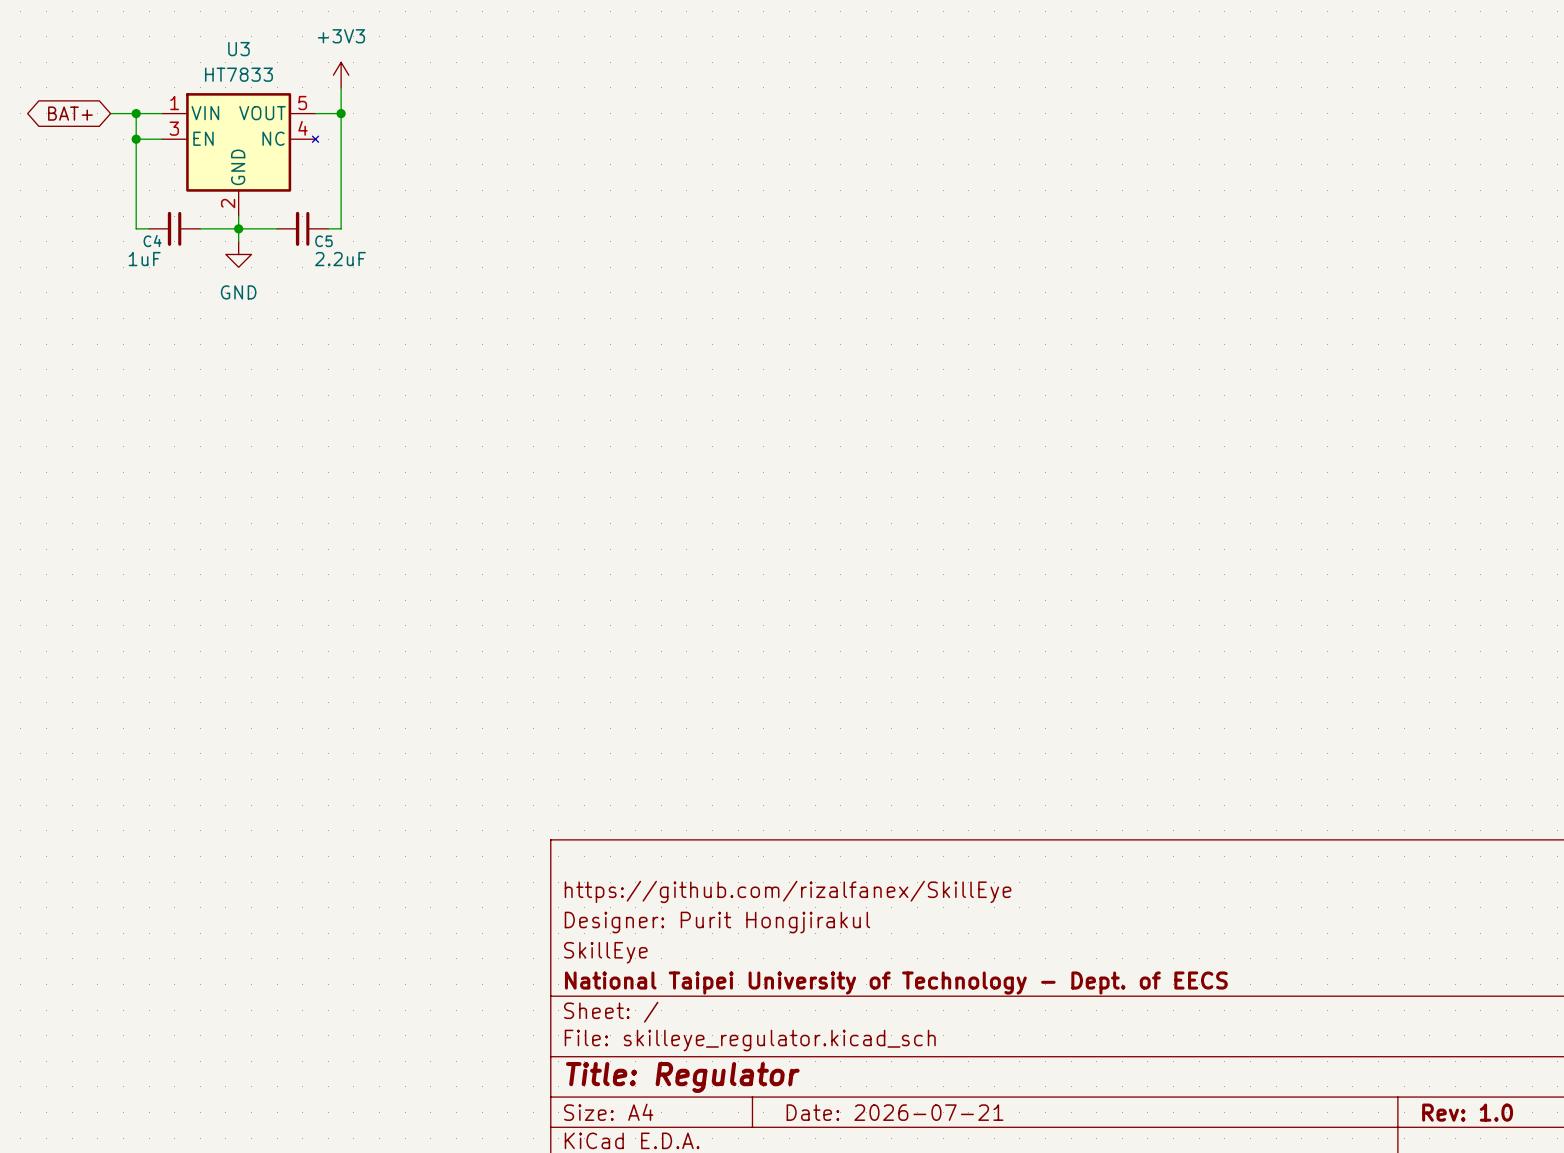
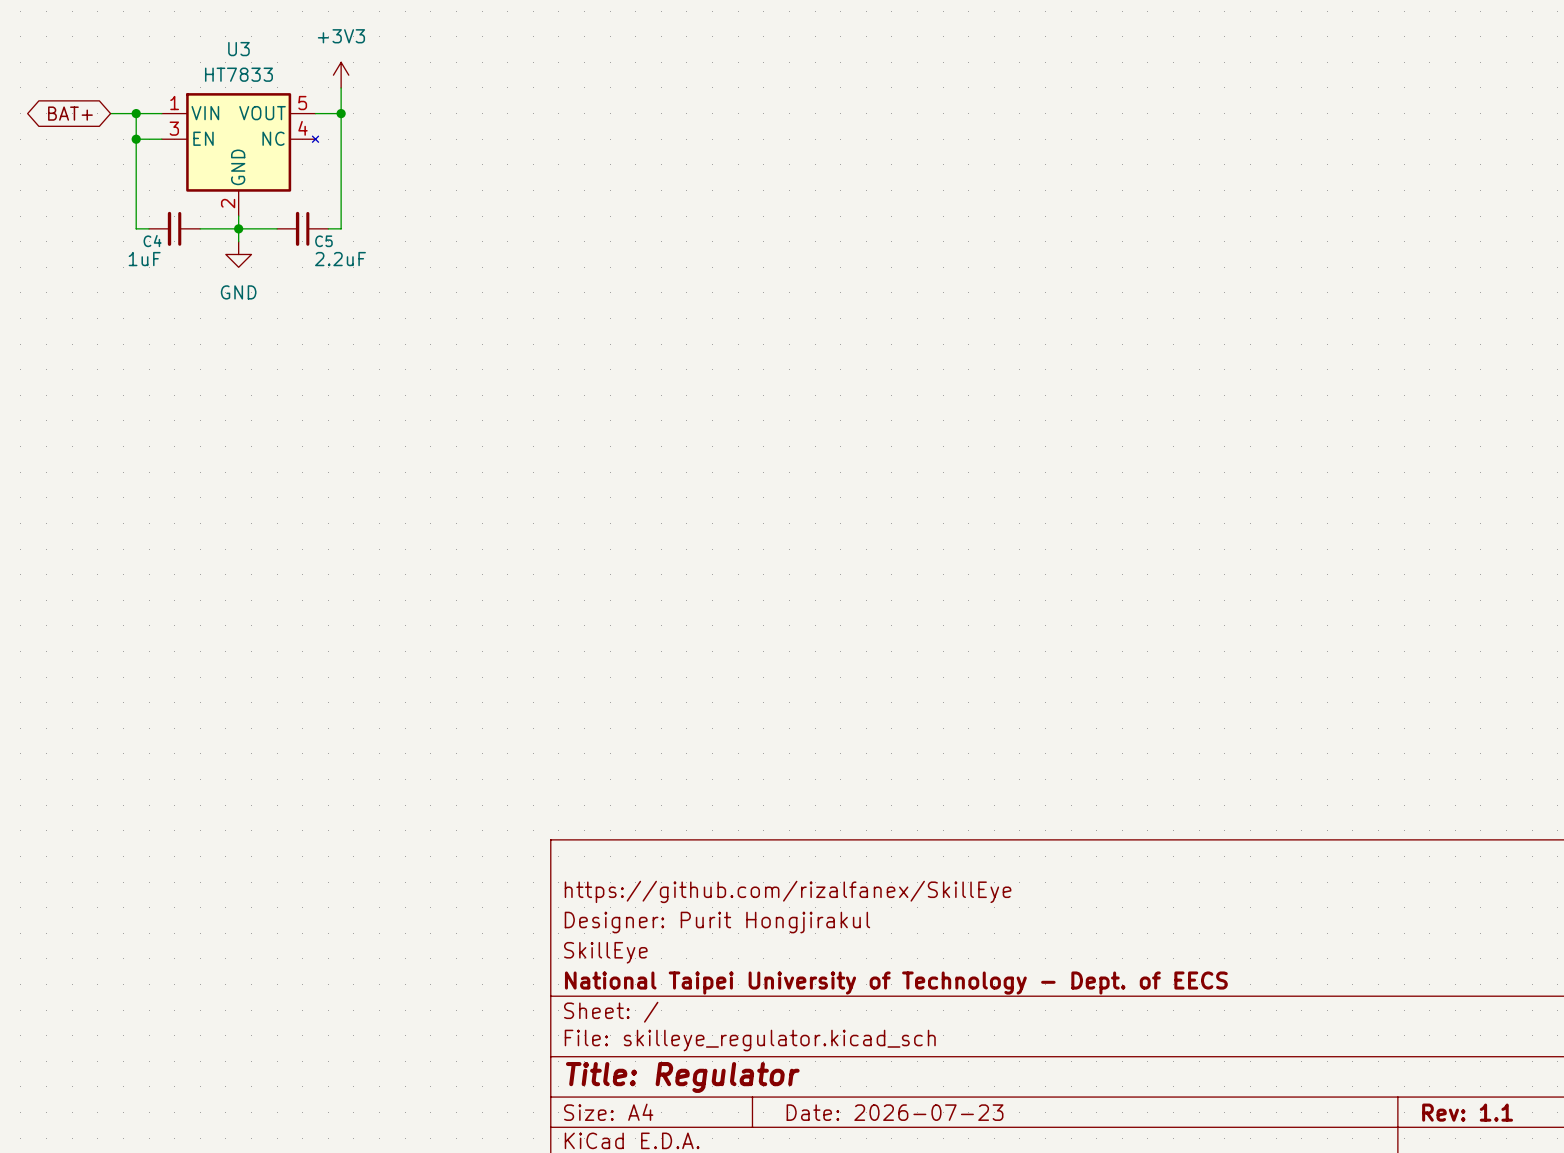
title block: Date: 2026-07-21 (895, 1112) -> Date: 2026-07-23 (895, 1112)
title block: Rev: 1.0 (1467, 1112) -> Rev: 1.1 (1467, 1112)

